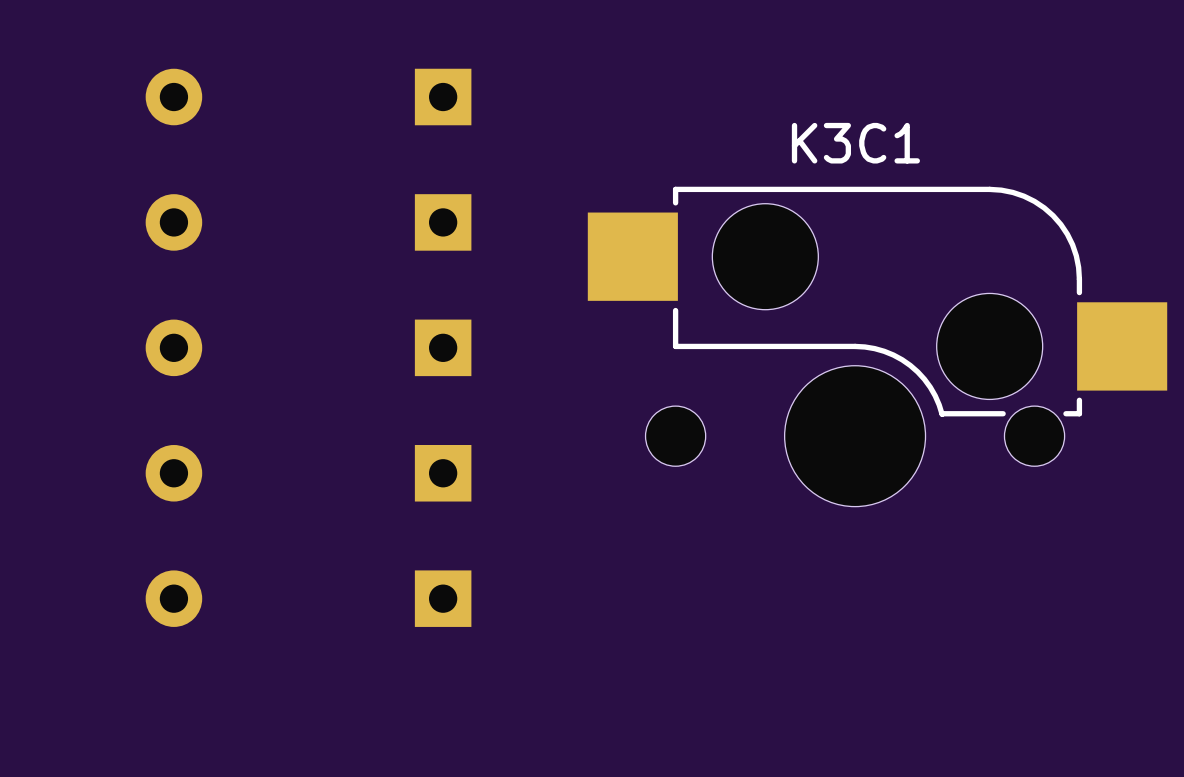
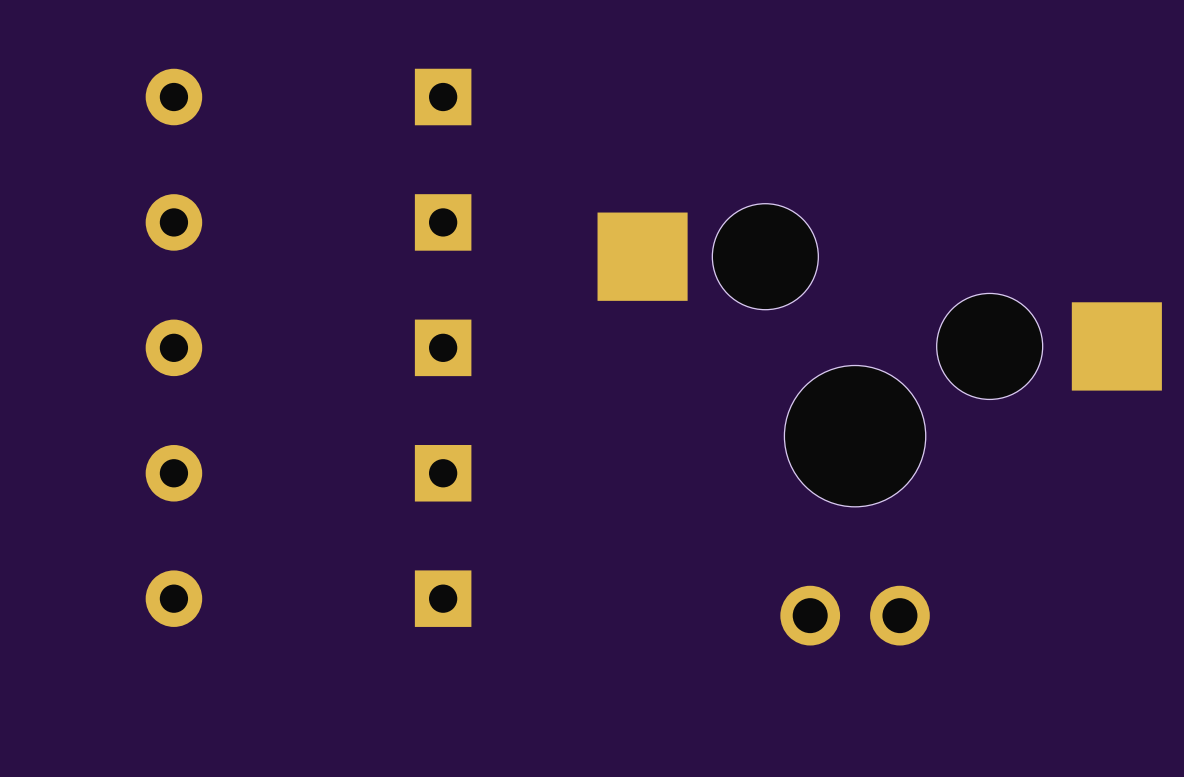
K3C1: (877, 346) -> none
part: none -> (879, 424)

